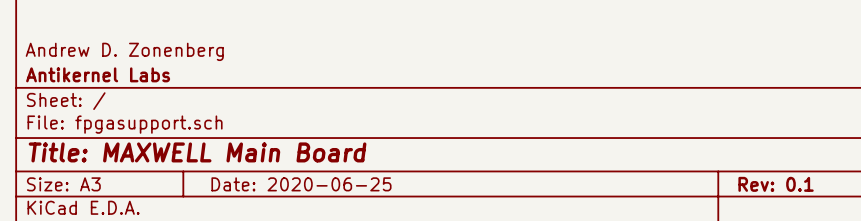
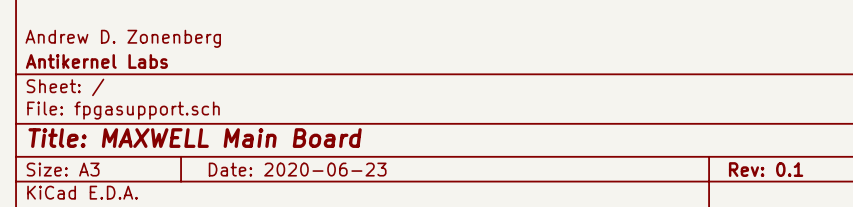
title block: Date: 2020-06-25 (301, 184) -> Date: 2020-06-23 (297, 169)

